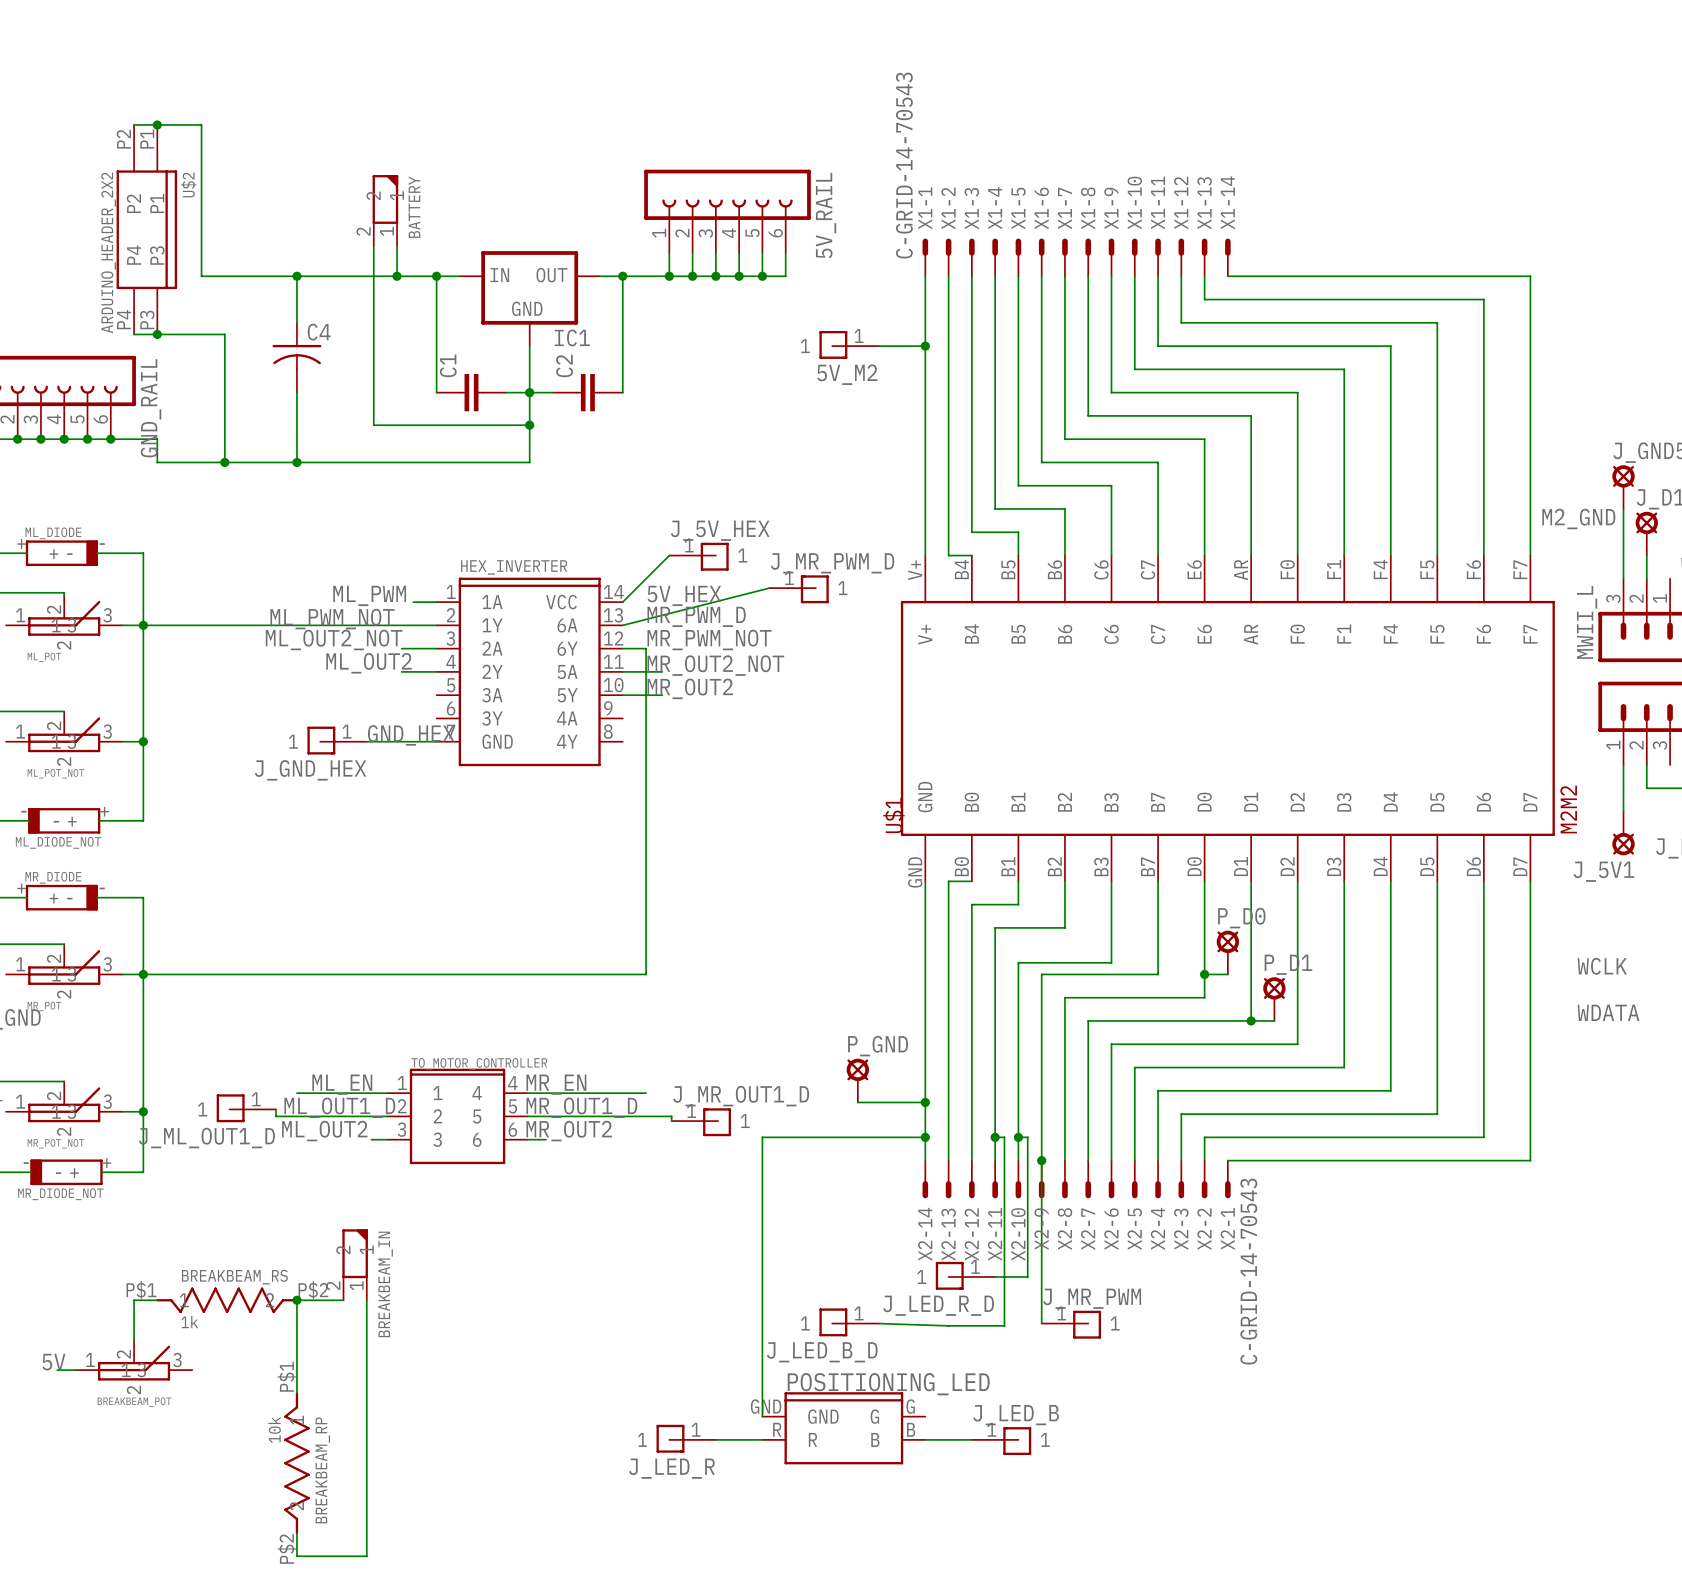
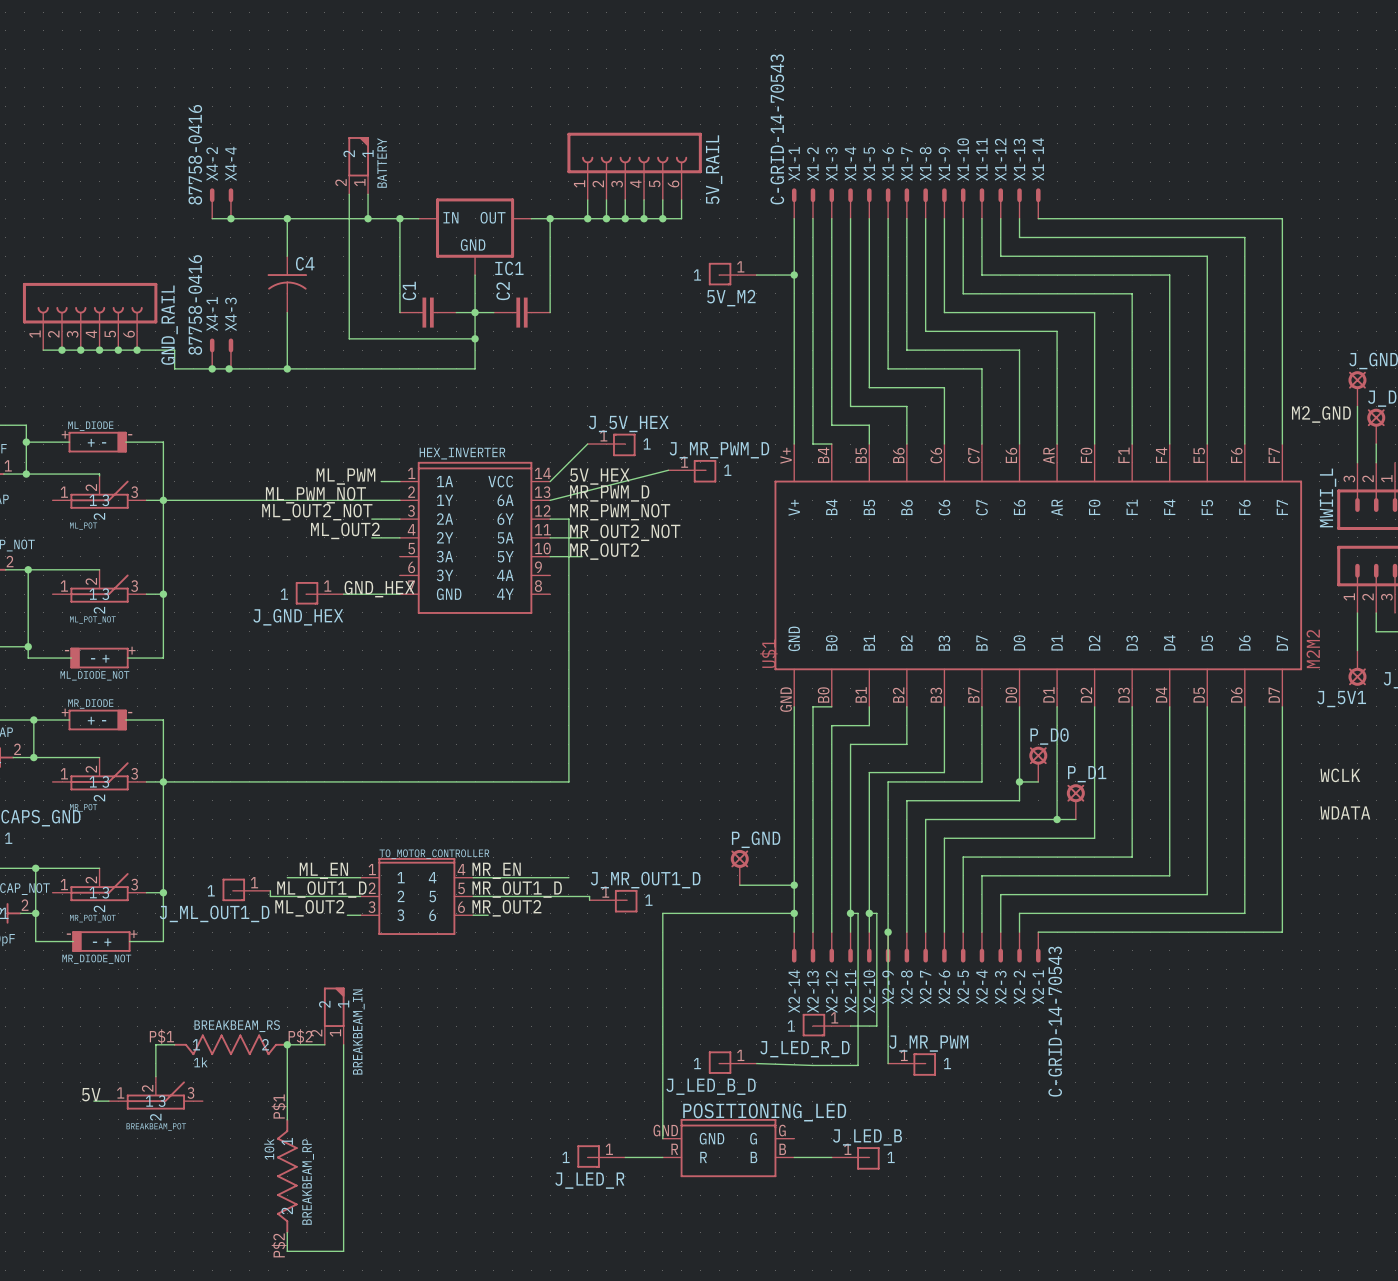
wire: (134, 125) (201, 125) (201, 276) (203, 276) -> none
junction: (157, 125) -> none
U$2: ARDUINO_HEADER_2X2 (146, 229) -> none
X4-2: none -> 87758-0416 (212, 203)
X4-4: none -> (230, 203)
junction: none -> (230, 218)
wire: (134, 334) (224, 334) (224, 462) -> none
junction: (157, 334) -> none
X4-1: none -> 87758-0416 (212, 353)
X4-3: none -> (230, 353)
junction: none -> (212, 368)

